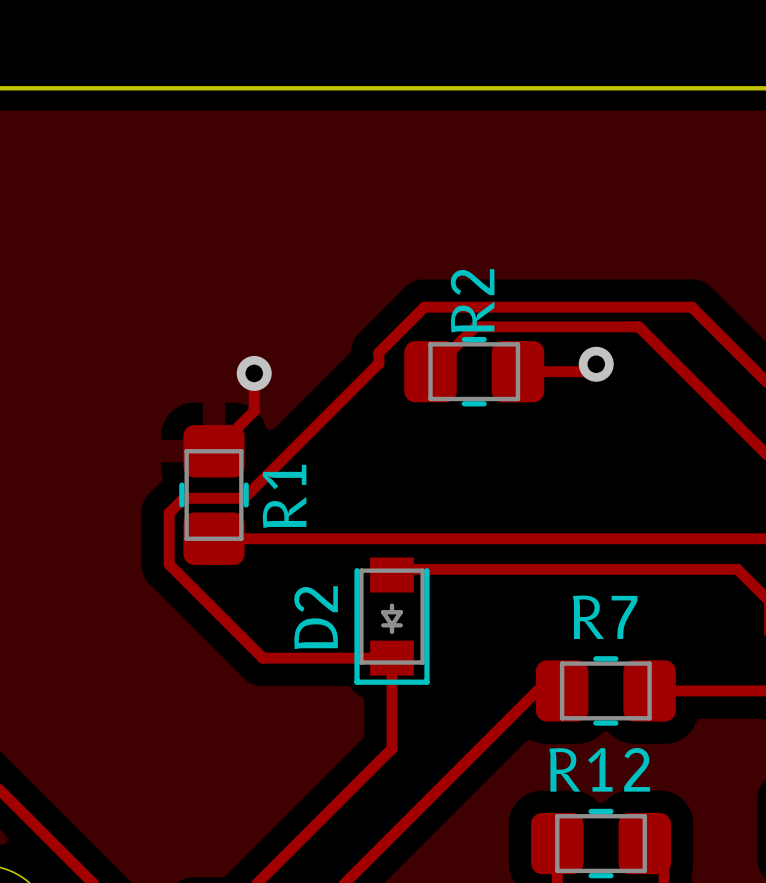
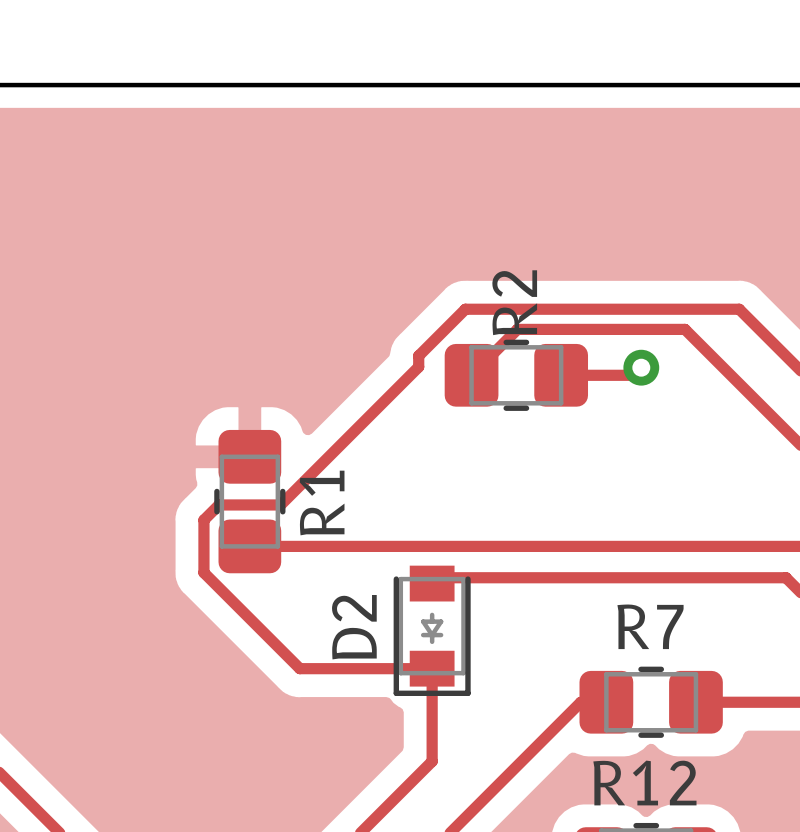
track: (254, 373) (254, 411) (214, 451) -> none
via: (254, 373) -> none

